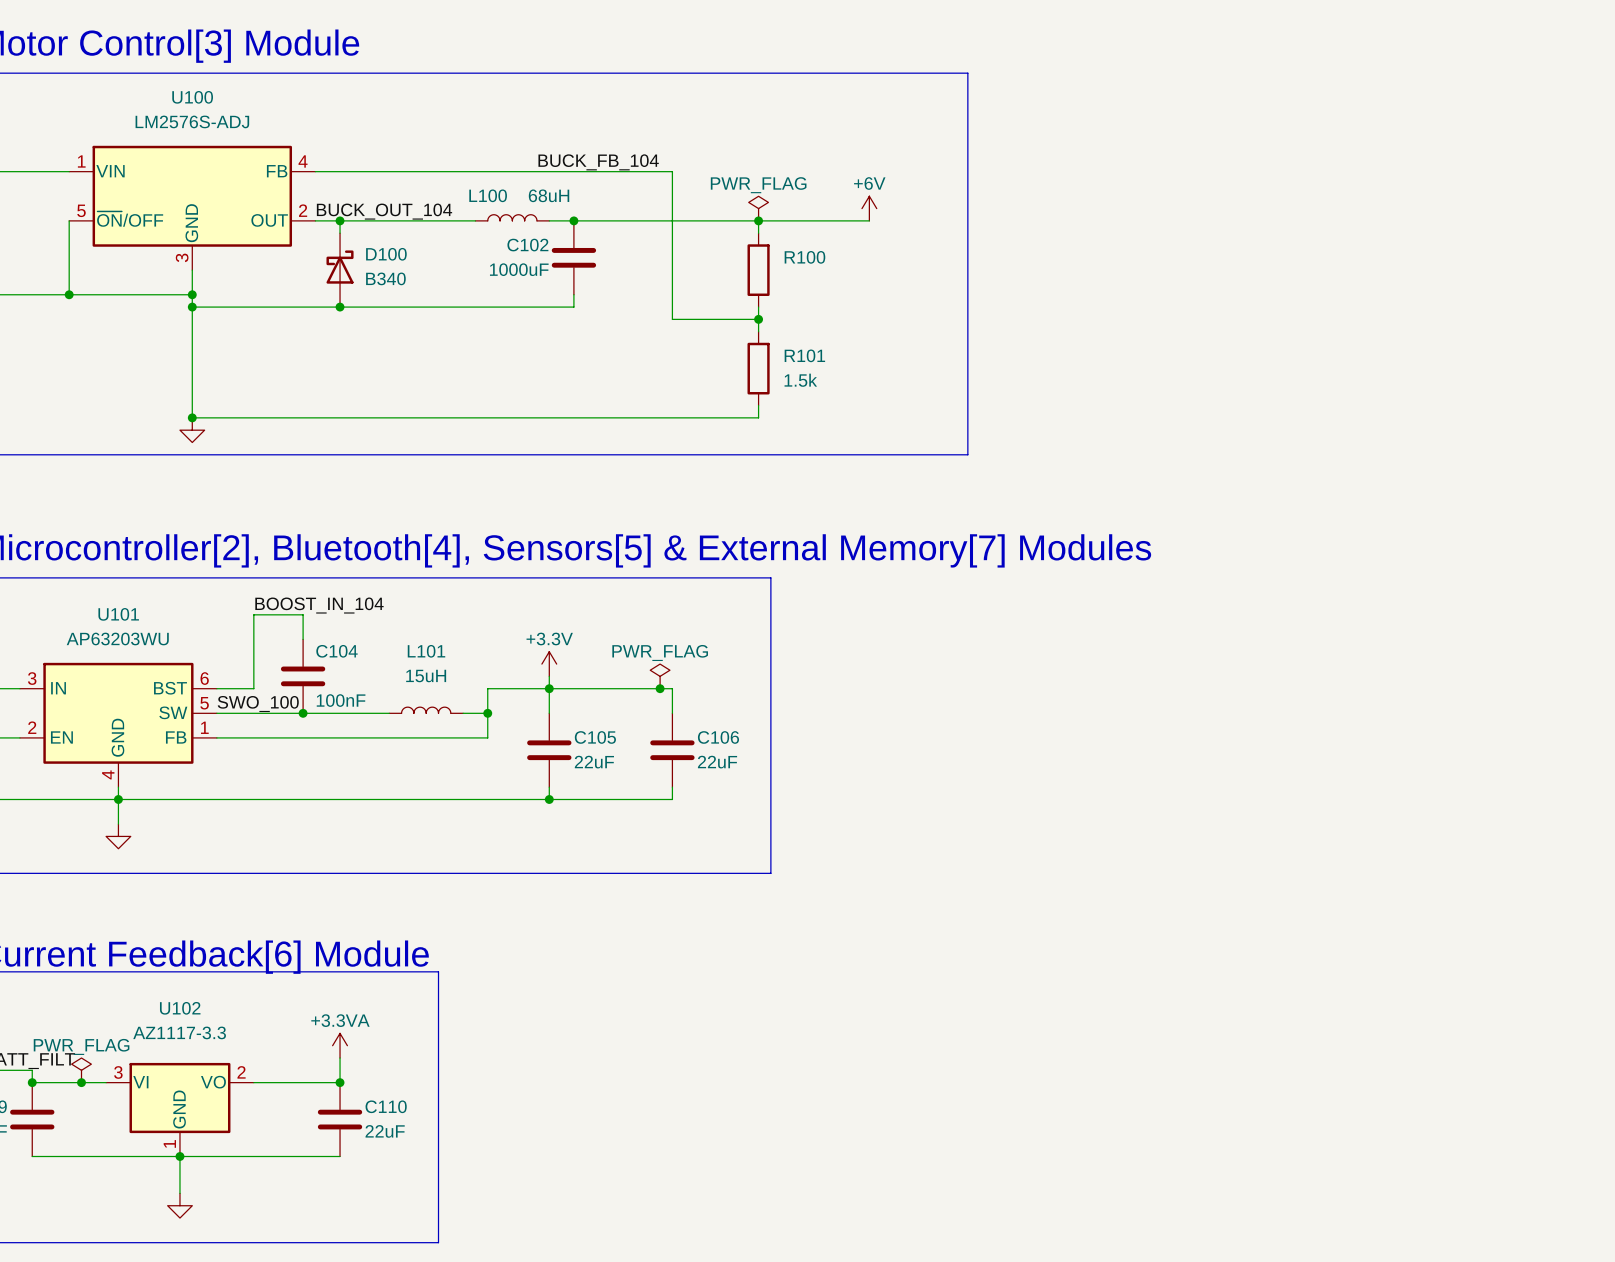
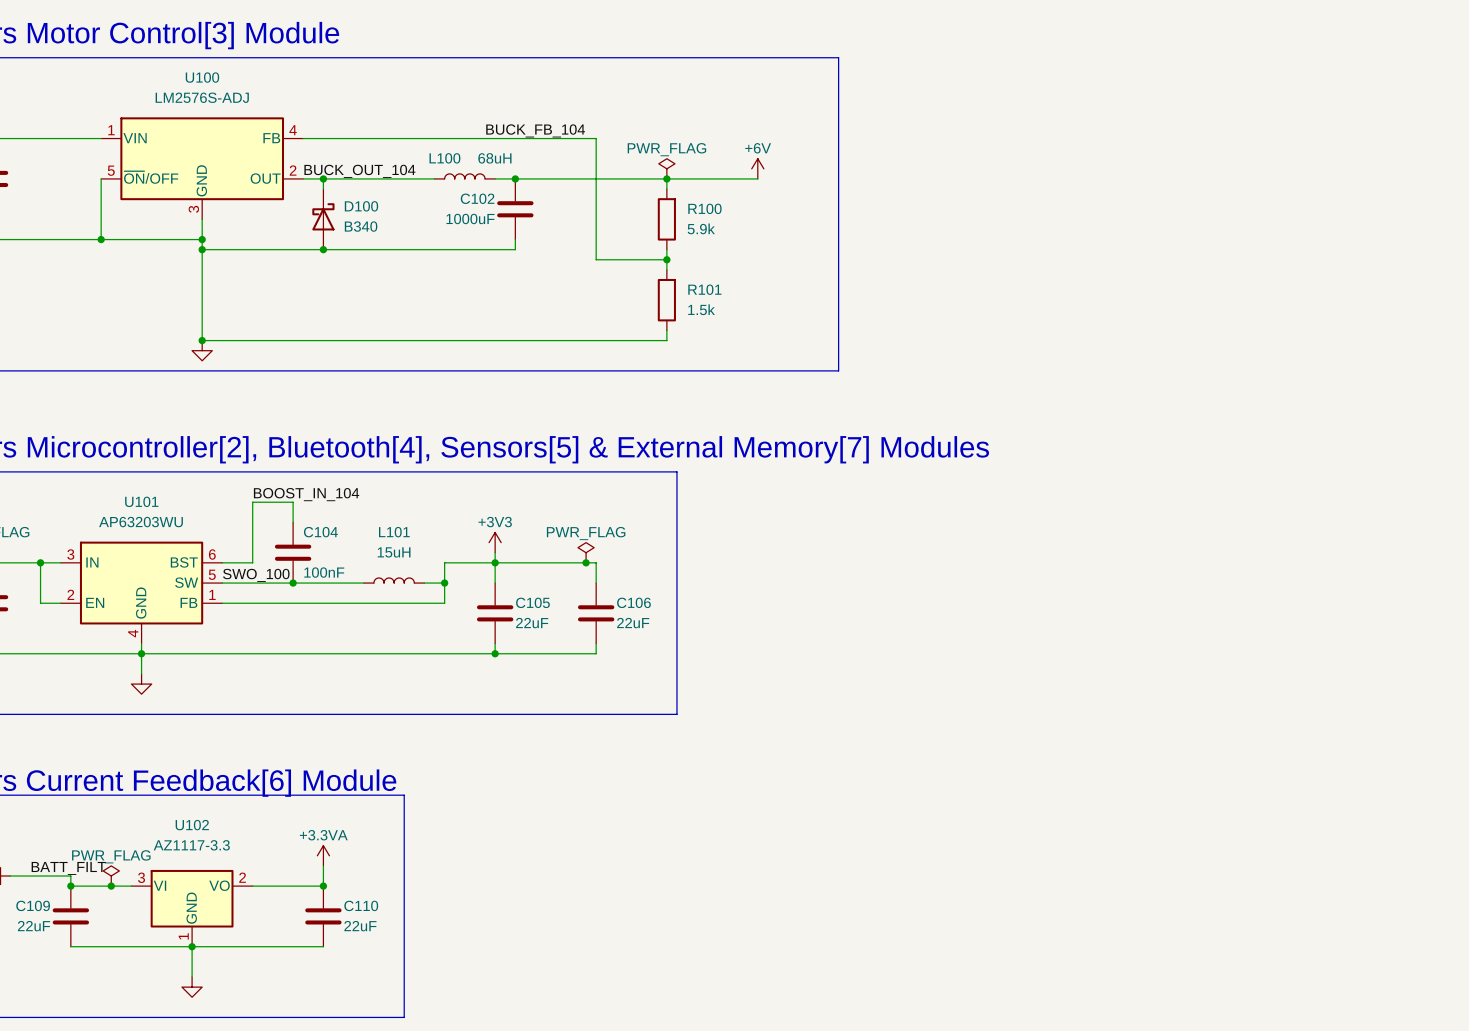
R100 value: none -> 5.9k (701, 228)
power symbol: +3.3V (549, 664) -> +3V3 (495, 542)

